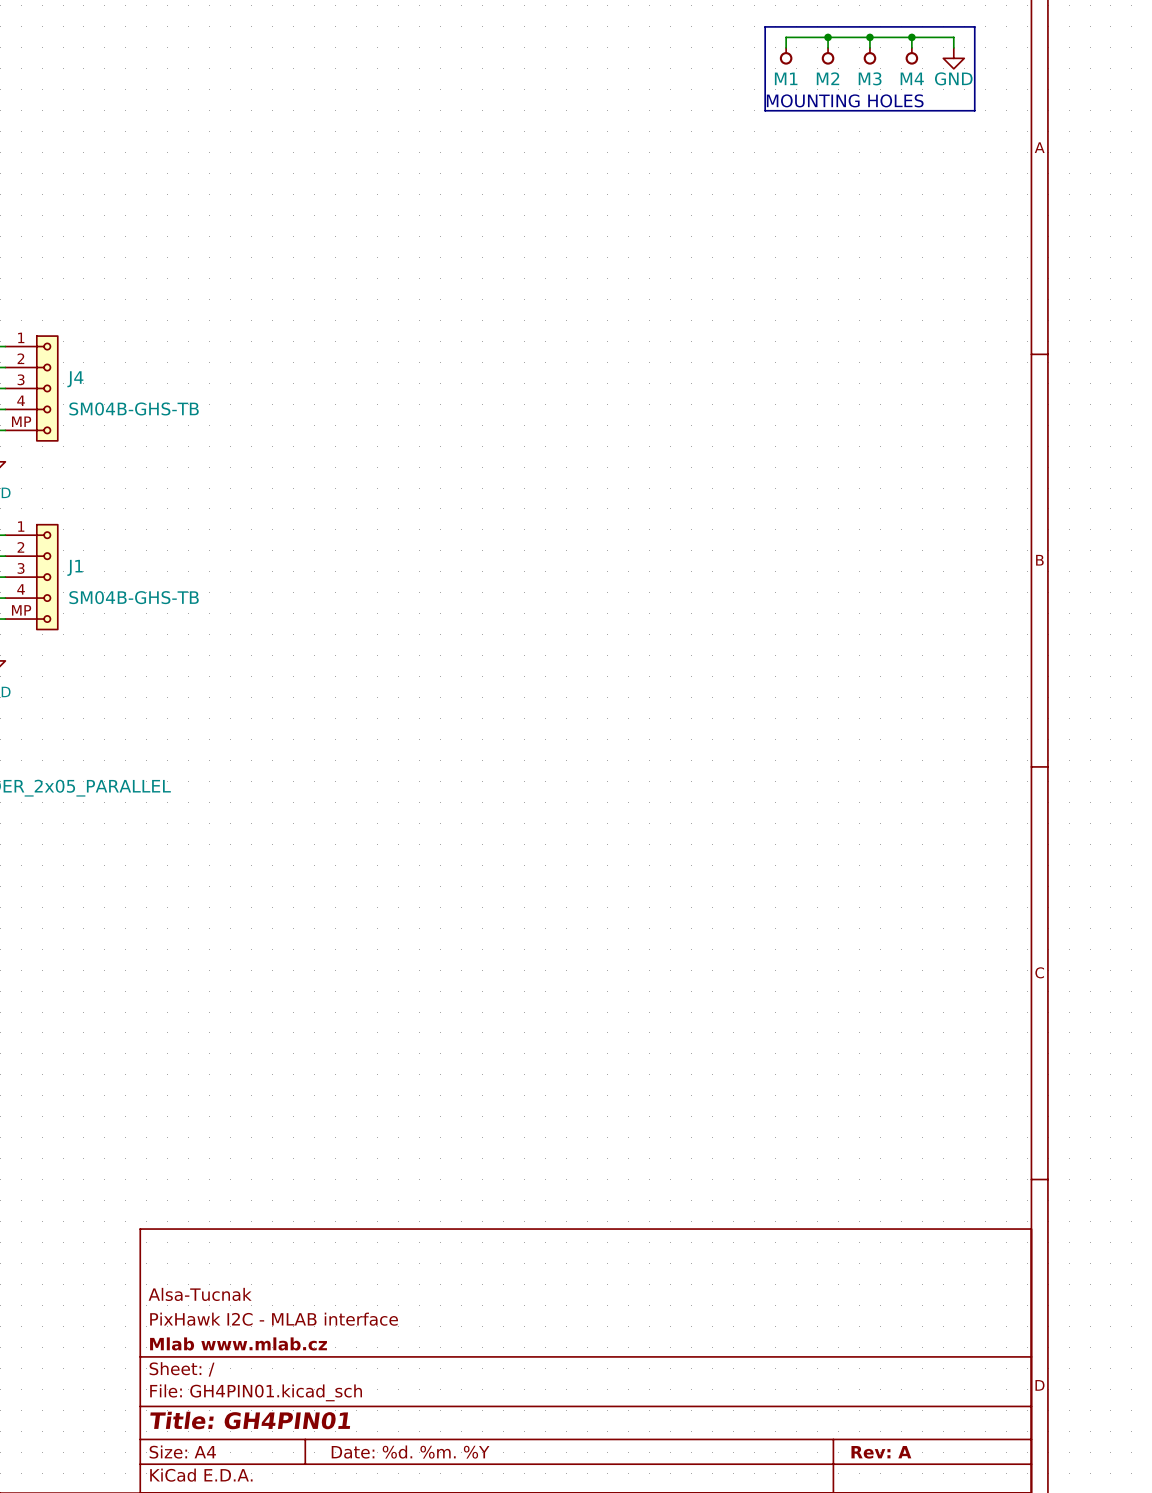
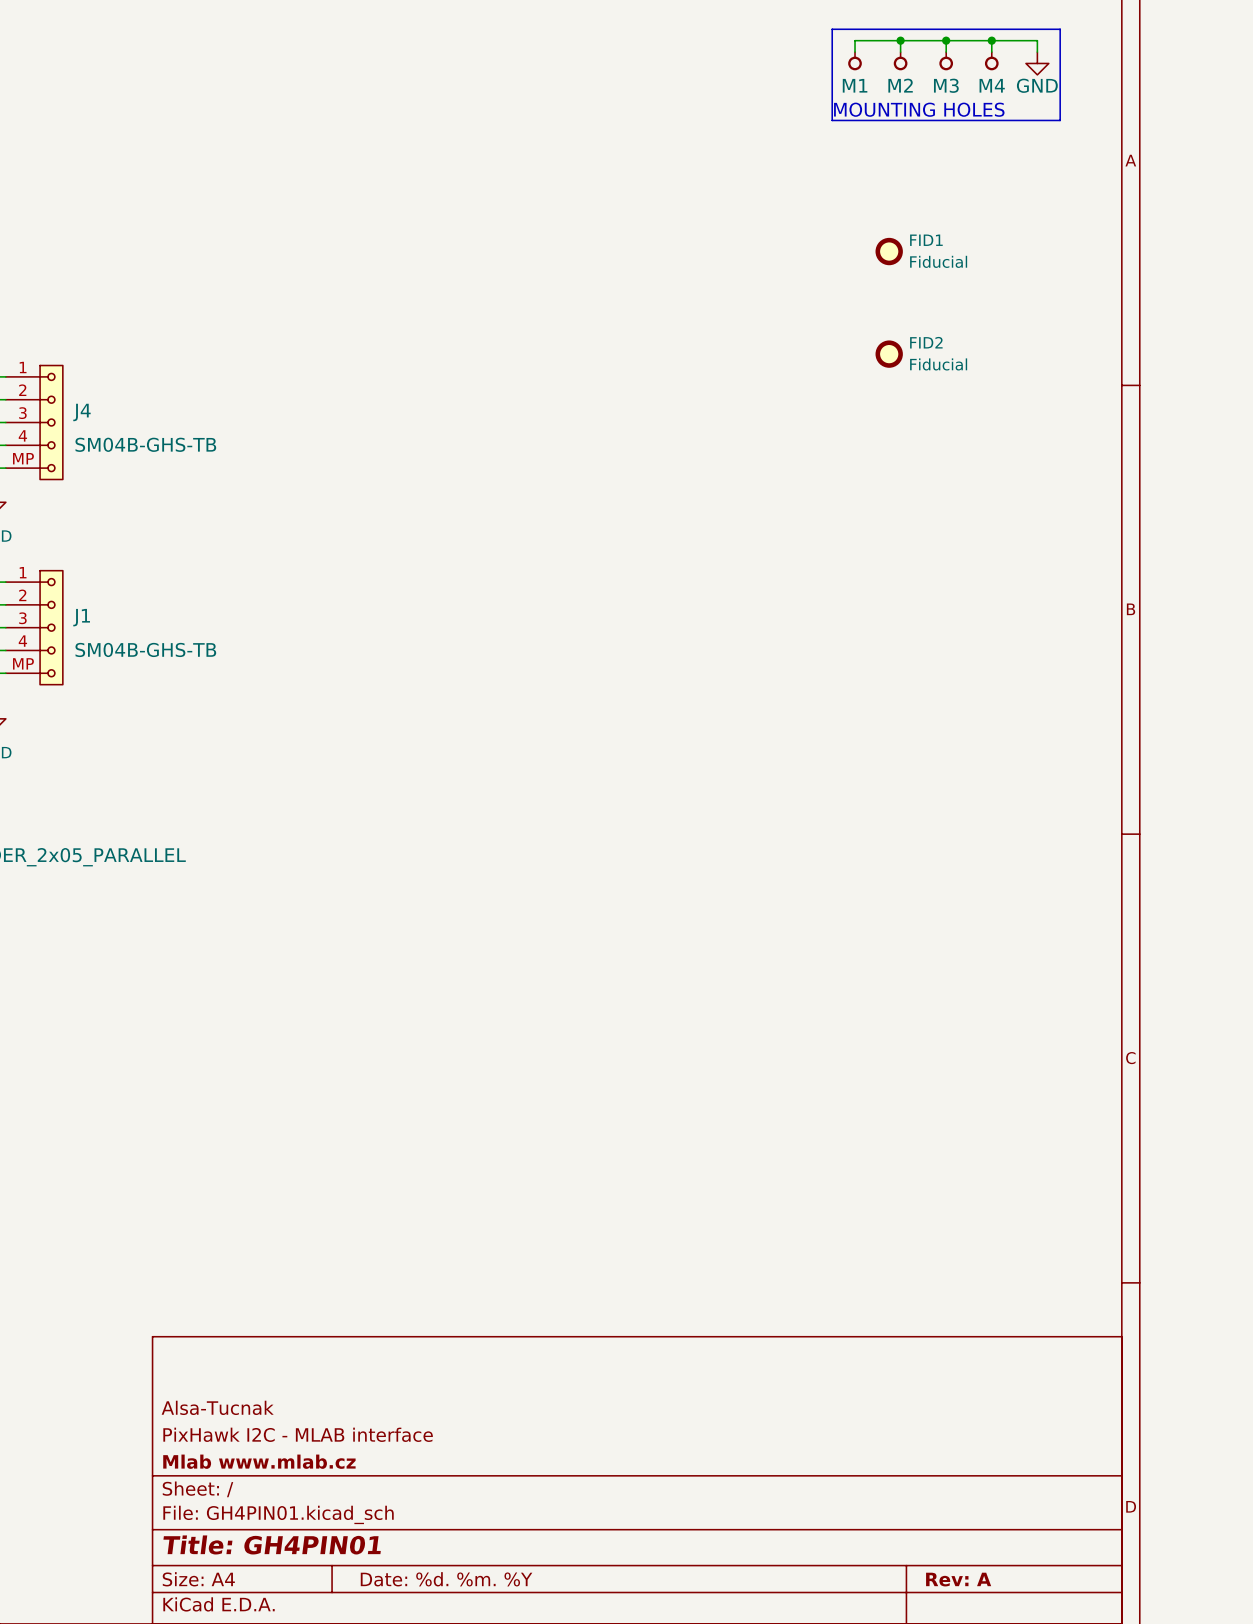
FID1: none -> Fiducial (889, 251)
FID2: none -> Fiducial (889, 354)

